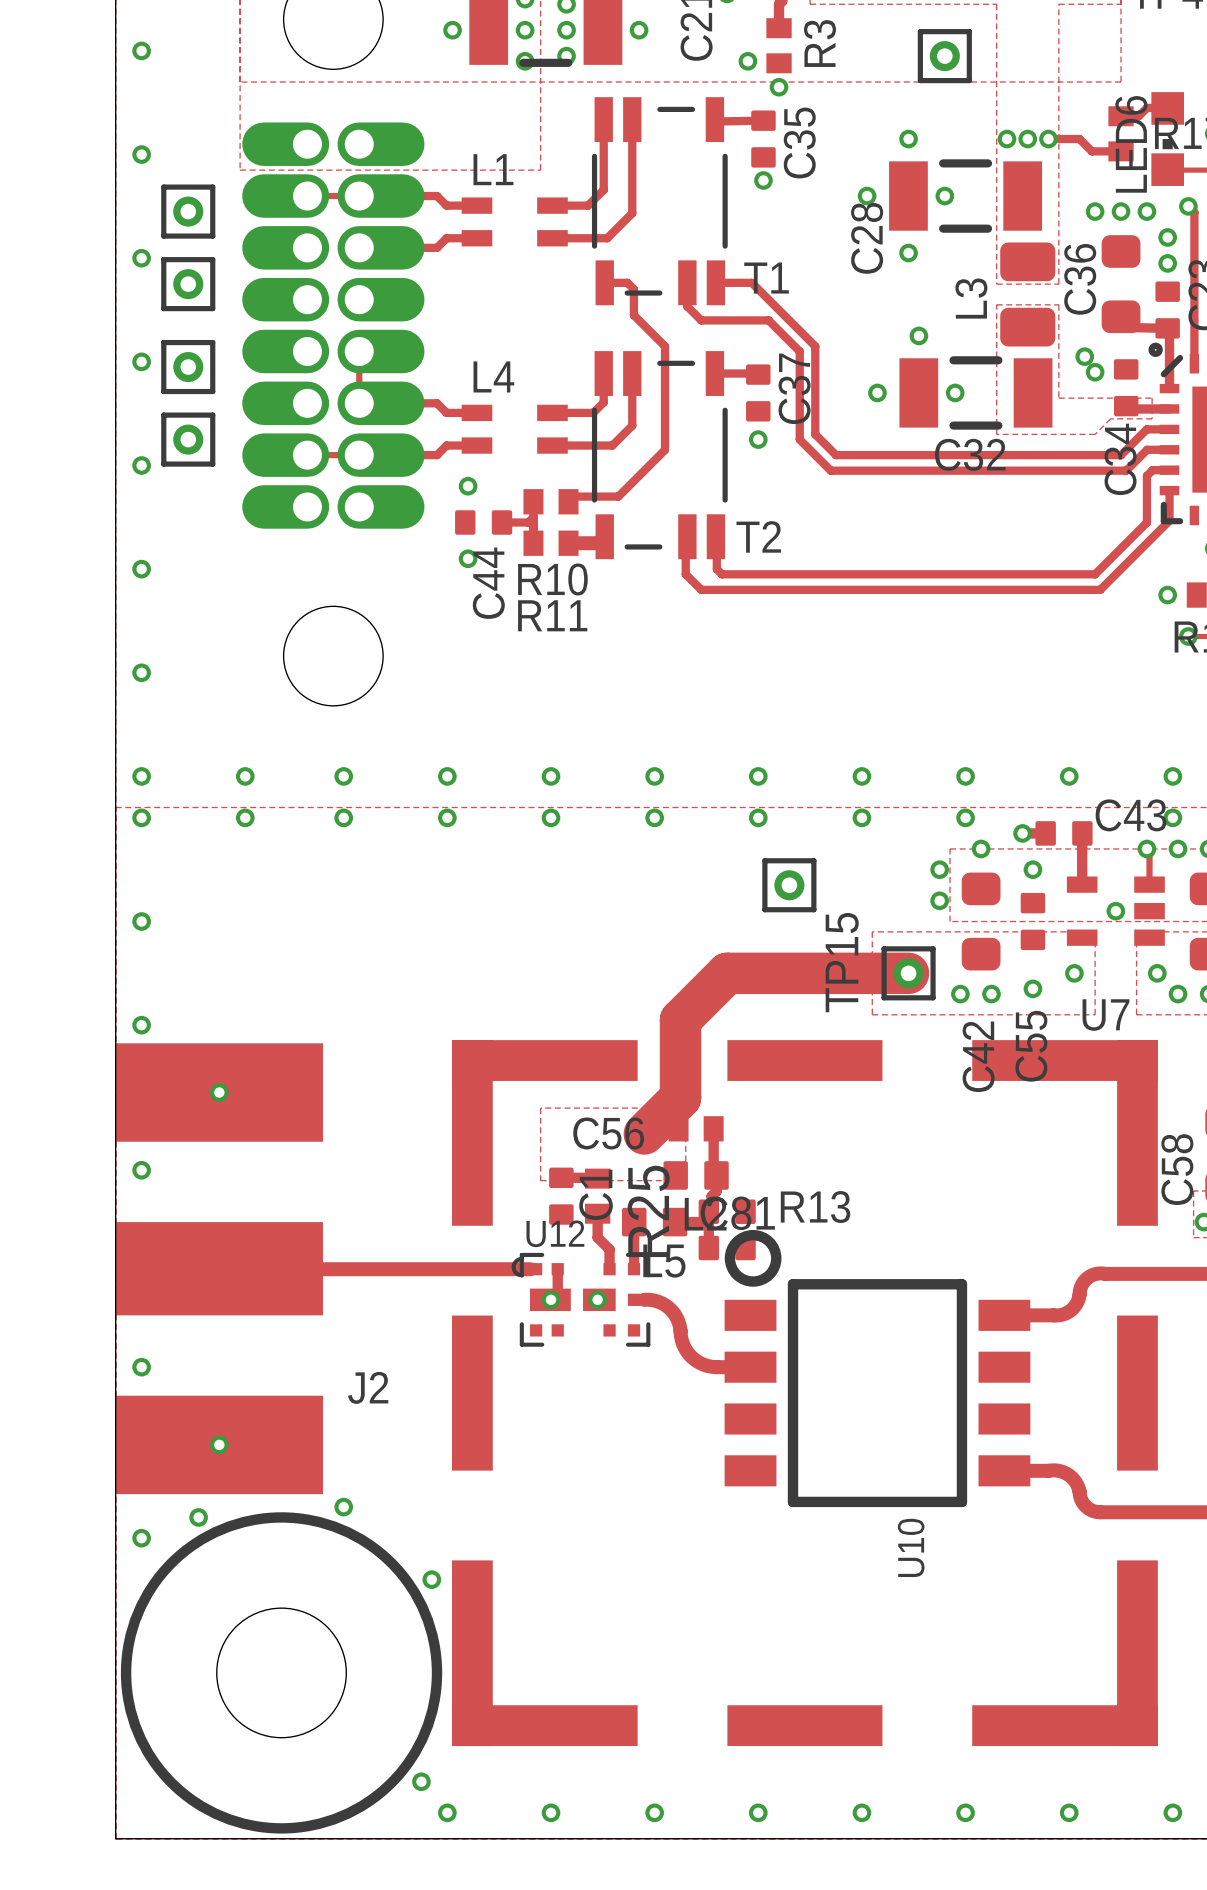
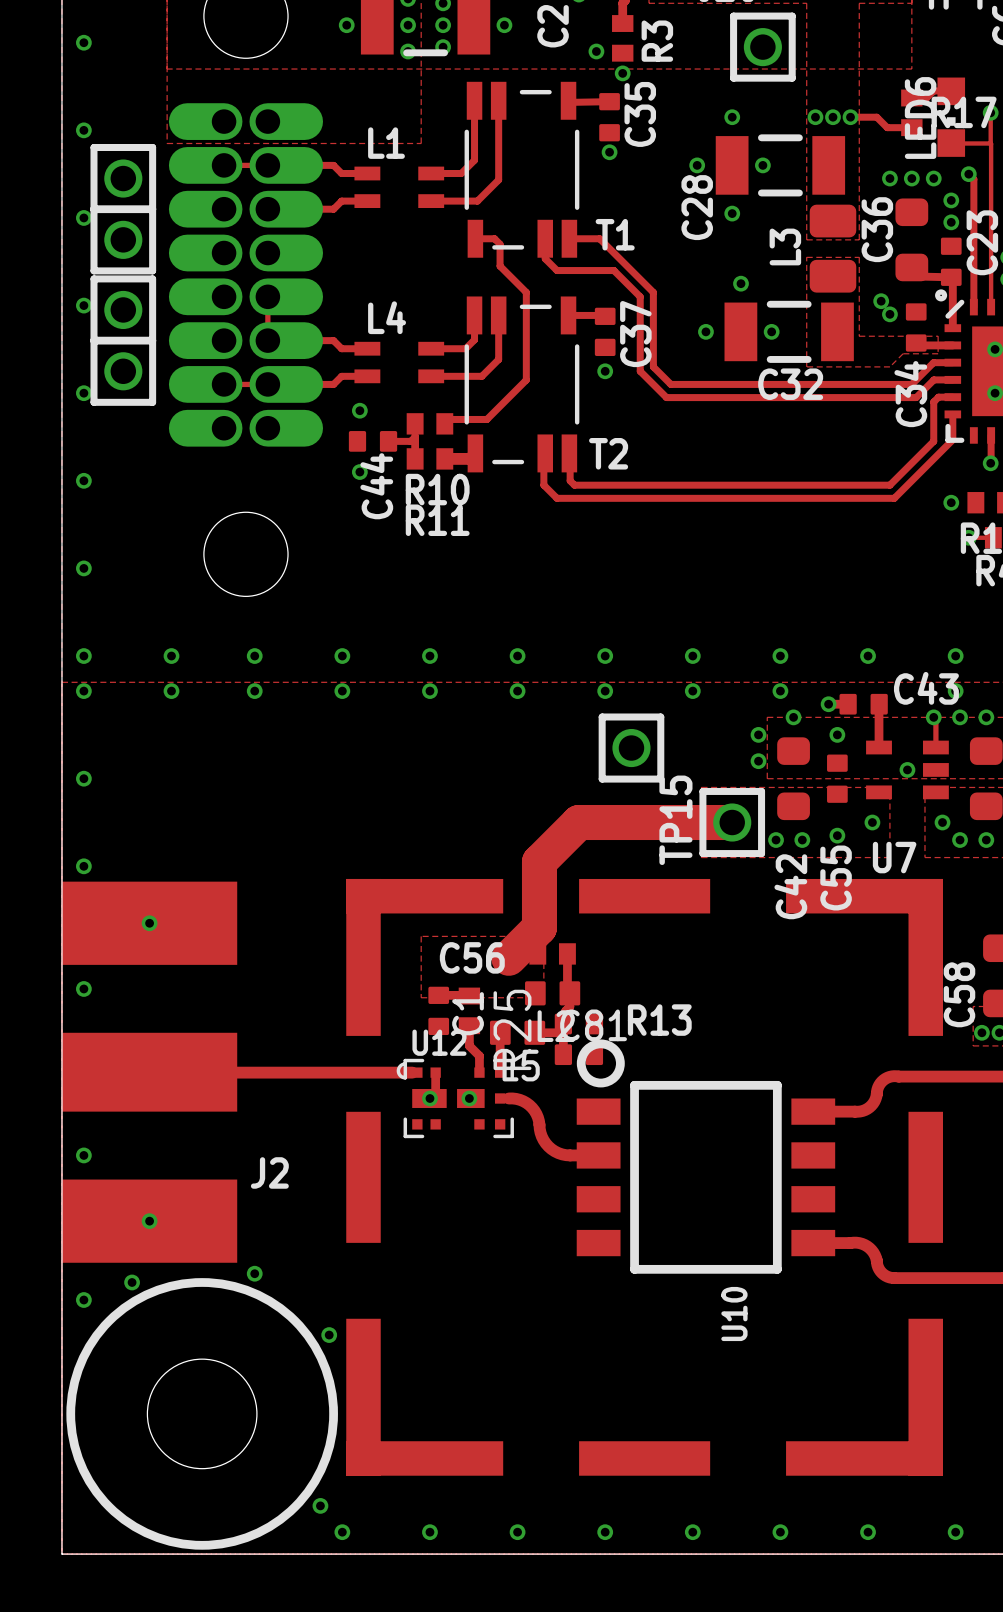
part footprint: [917, 29, 972, 84] -> [730, 12, 796, 82]
part footprint: [161, 184, 216, 239] -> [90, 143, 157, 214]
part footprint: [161, 257, 216, 312] -> [90, 205, 157, 275]
part footprint: [161, 339, 216, 395] -> [90, 275, 157, 345]
part footprint: [161, 412, 216, 467] -> [90, 336, 157, 406]
part footprint: [762, 858, 817, 913] -> [598, 713, 665, 783]
TP15 footprint: [881, 946, 936, 1001] -> [699, 787, 766, 858]

